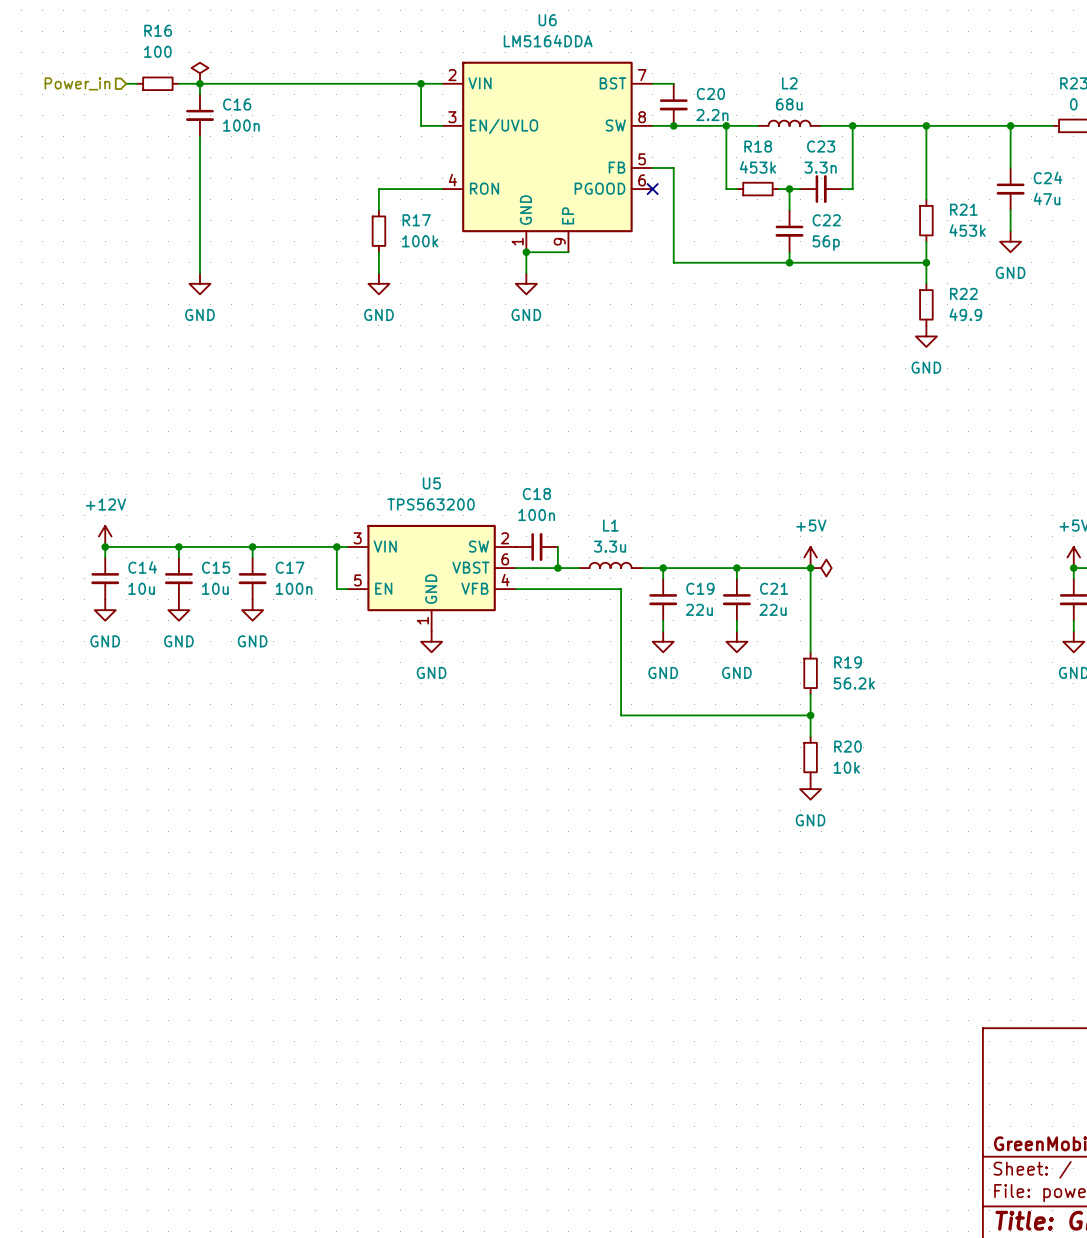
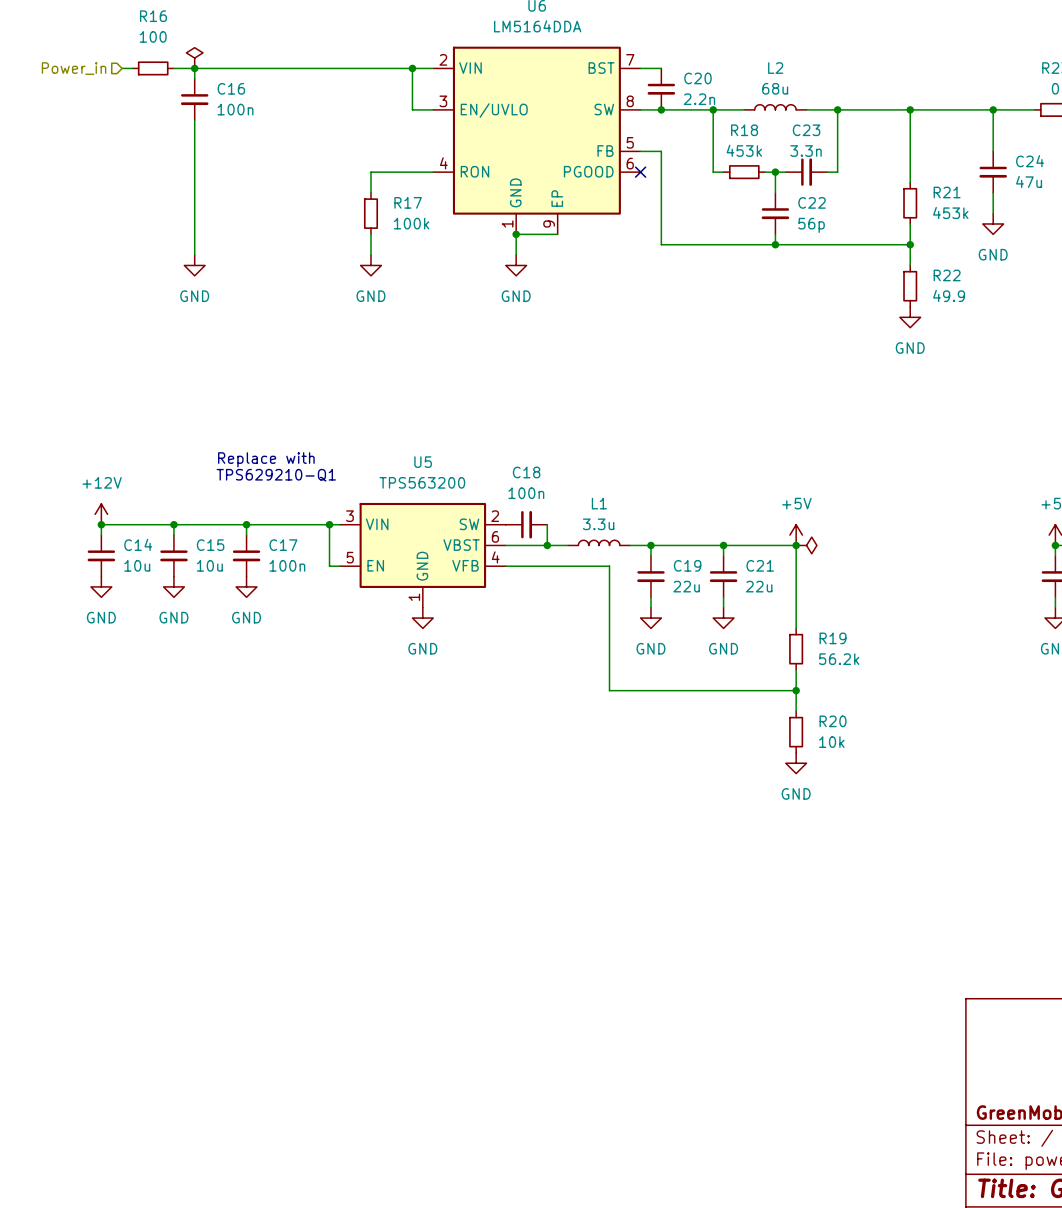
text: none -> Replace with (266, 459)
text: none -> TPS629210-Q1 (276, 475)

